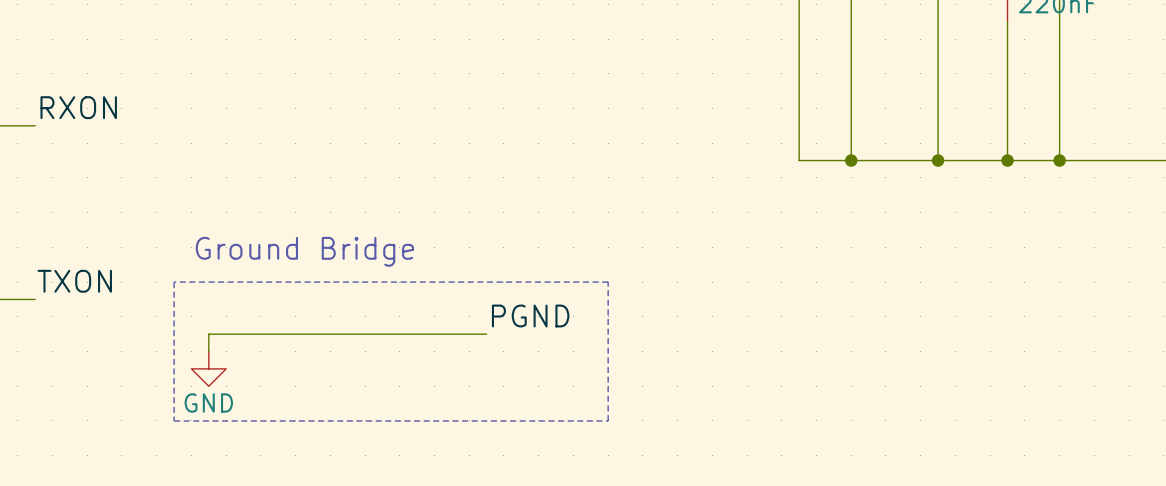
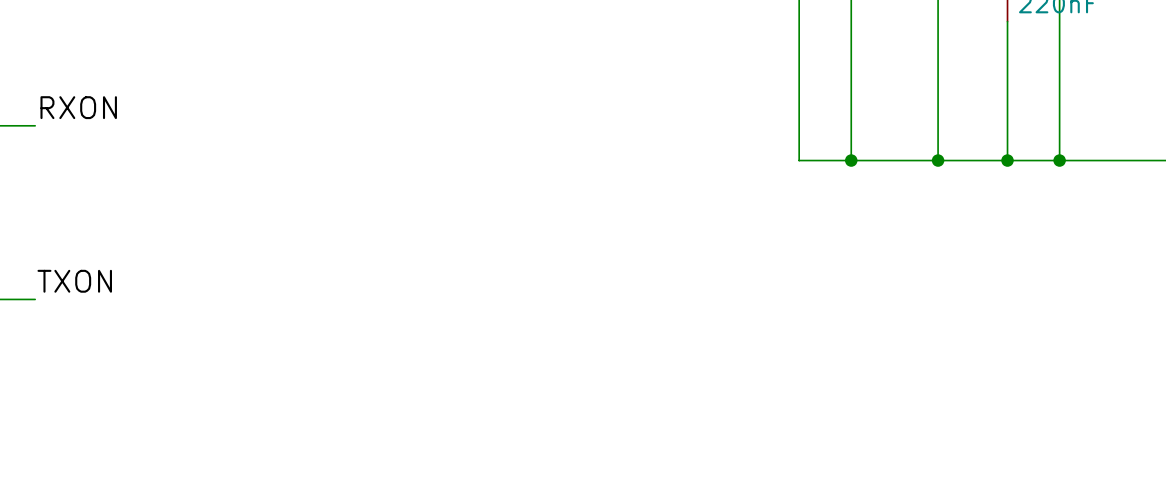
text: Ground Bridge (304, 251) -> none
line: (174, 282) (174, 420) (608, 420) (608, 282) (174, 282) -> none
label: PGND (530, 316) -> none
wire: (486, 334) (208, 334) (208, 351) -> none
power symbol: GND (208, 368) -> none

